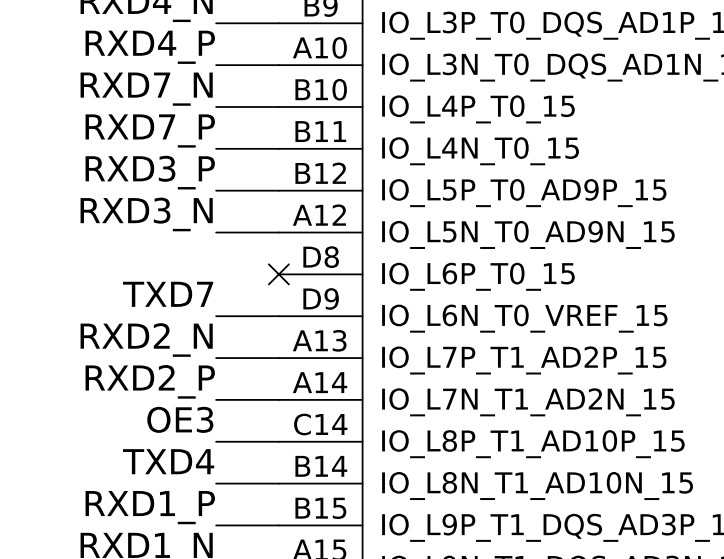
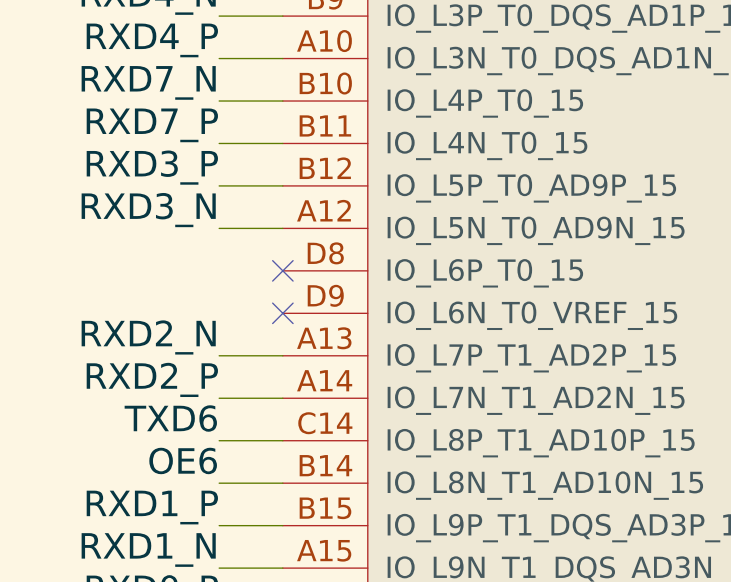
label: TXD7 (168, 294) -> none
wire: (216, 316) (278, 316) -> none
no-connect mark: none -> (282, 313)
label: OE3 (180, 419) -> TXD6 (170, 418)
label: TXD4 (168, 461) -> OE6 (183, 460)

